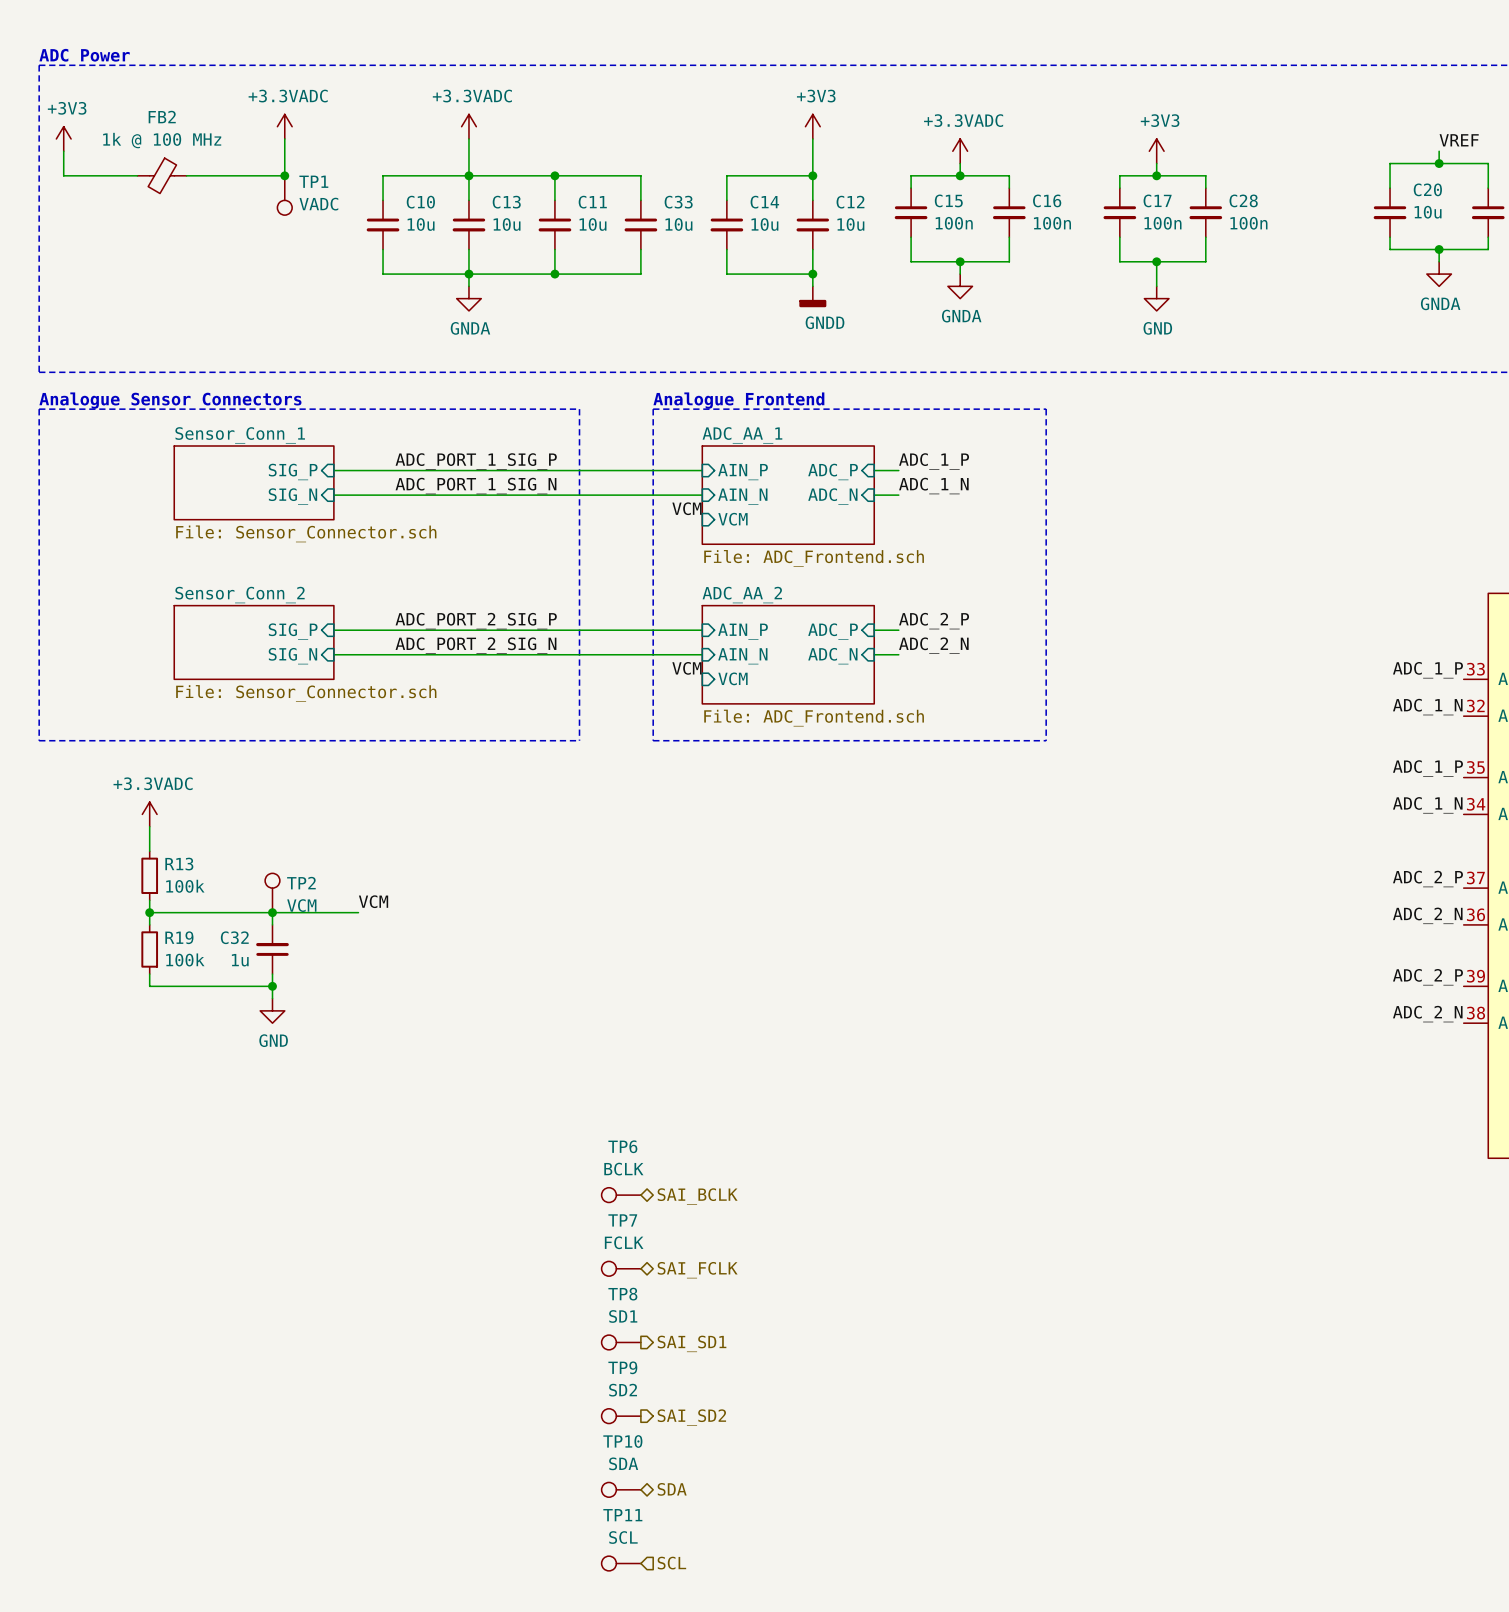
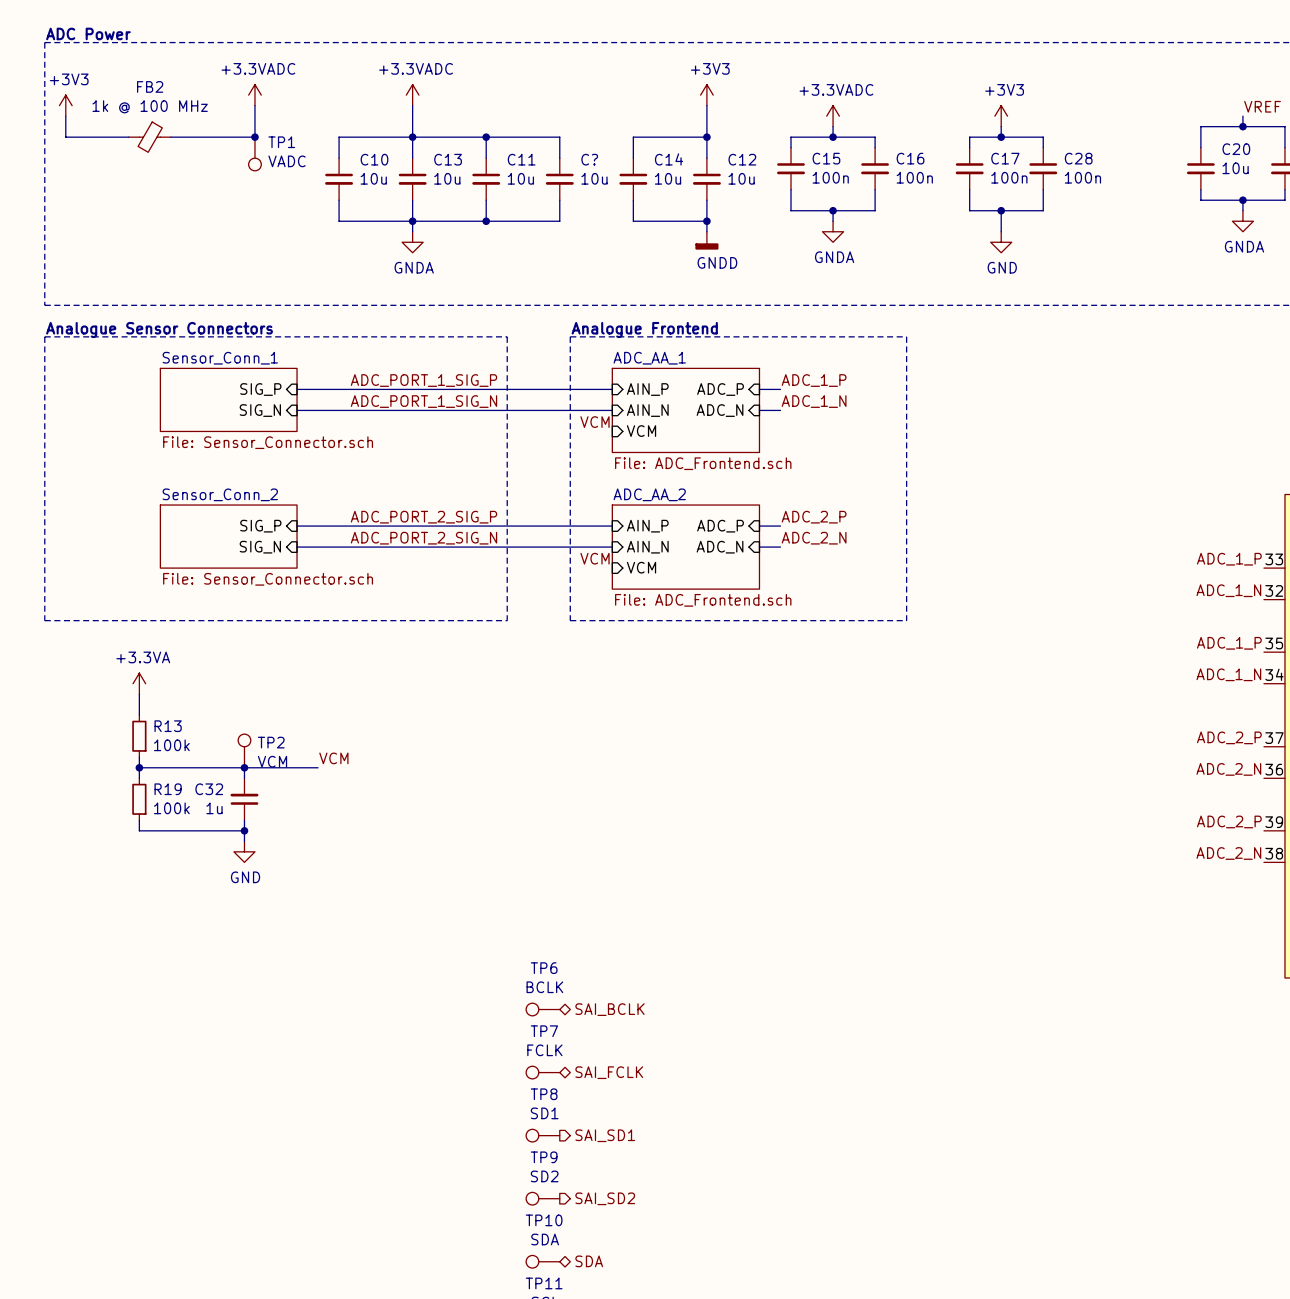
C33 name: C33 (678, 202) -> C? (589, 159)
power symbol: +3.3VADC (149, 814) -> +3.3VA (139, 683)

